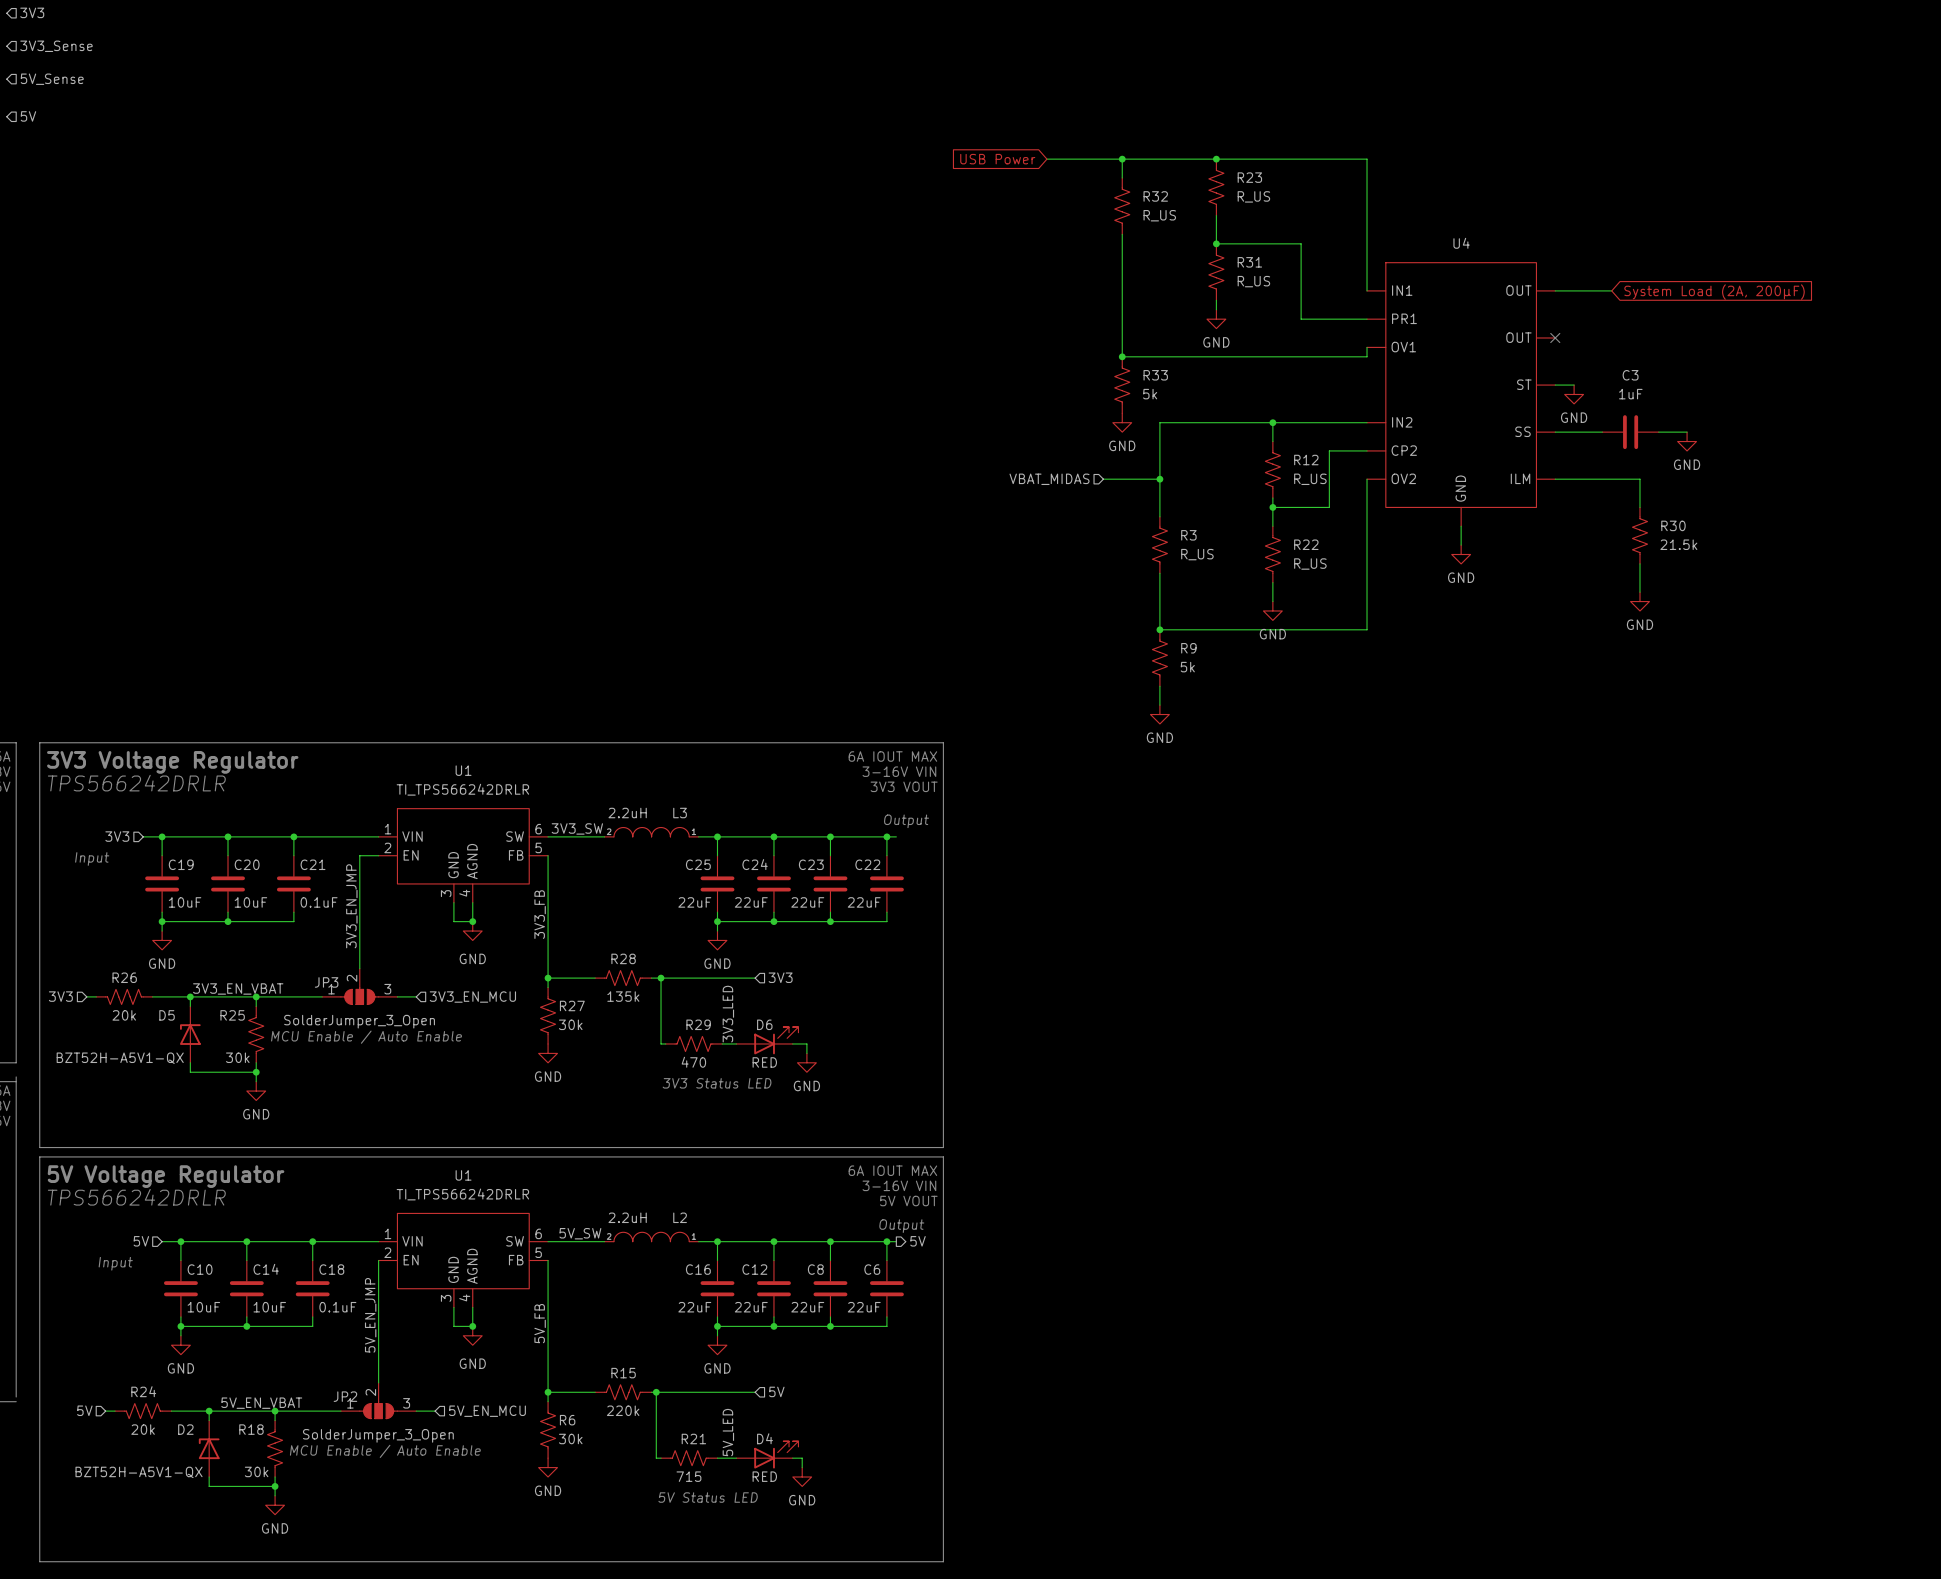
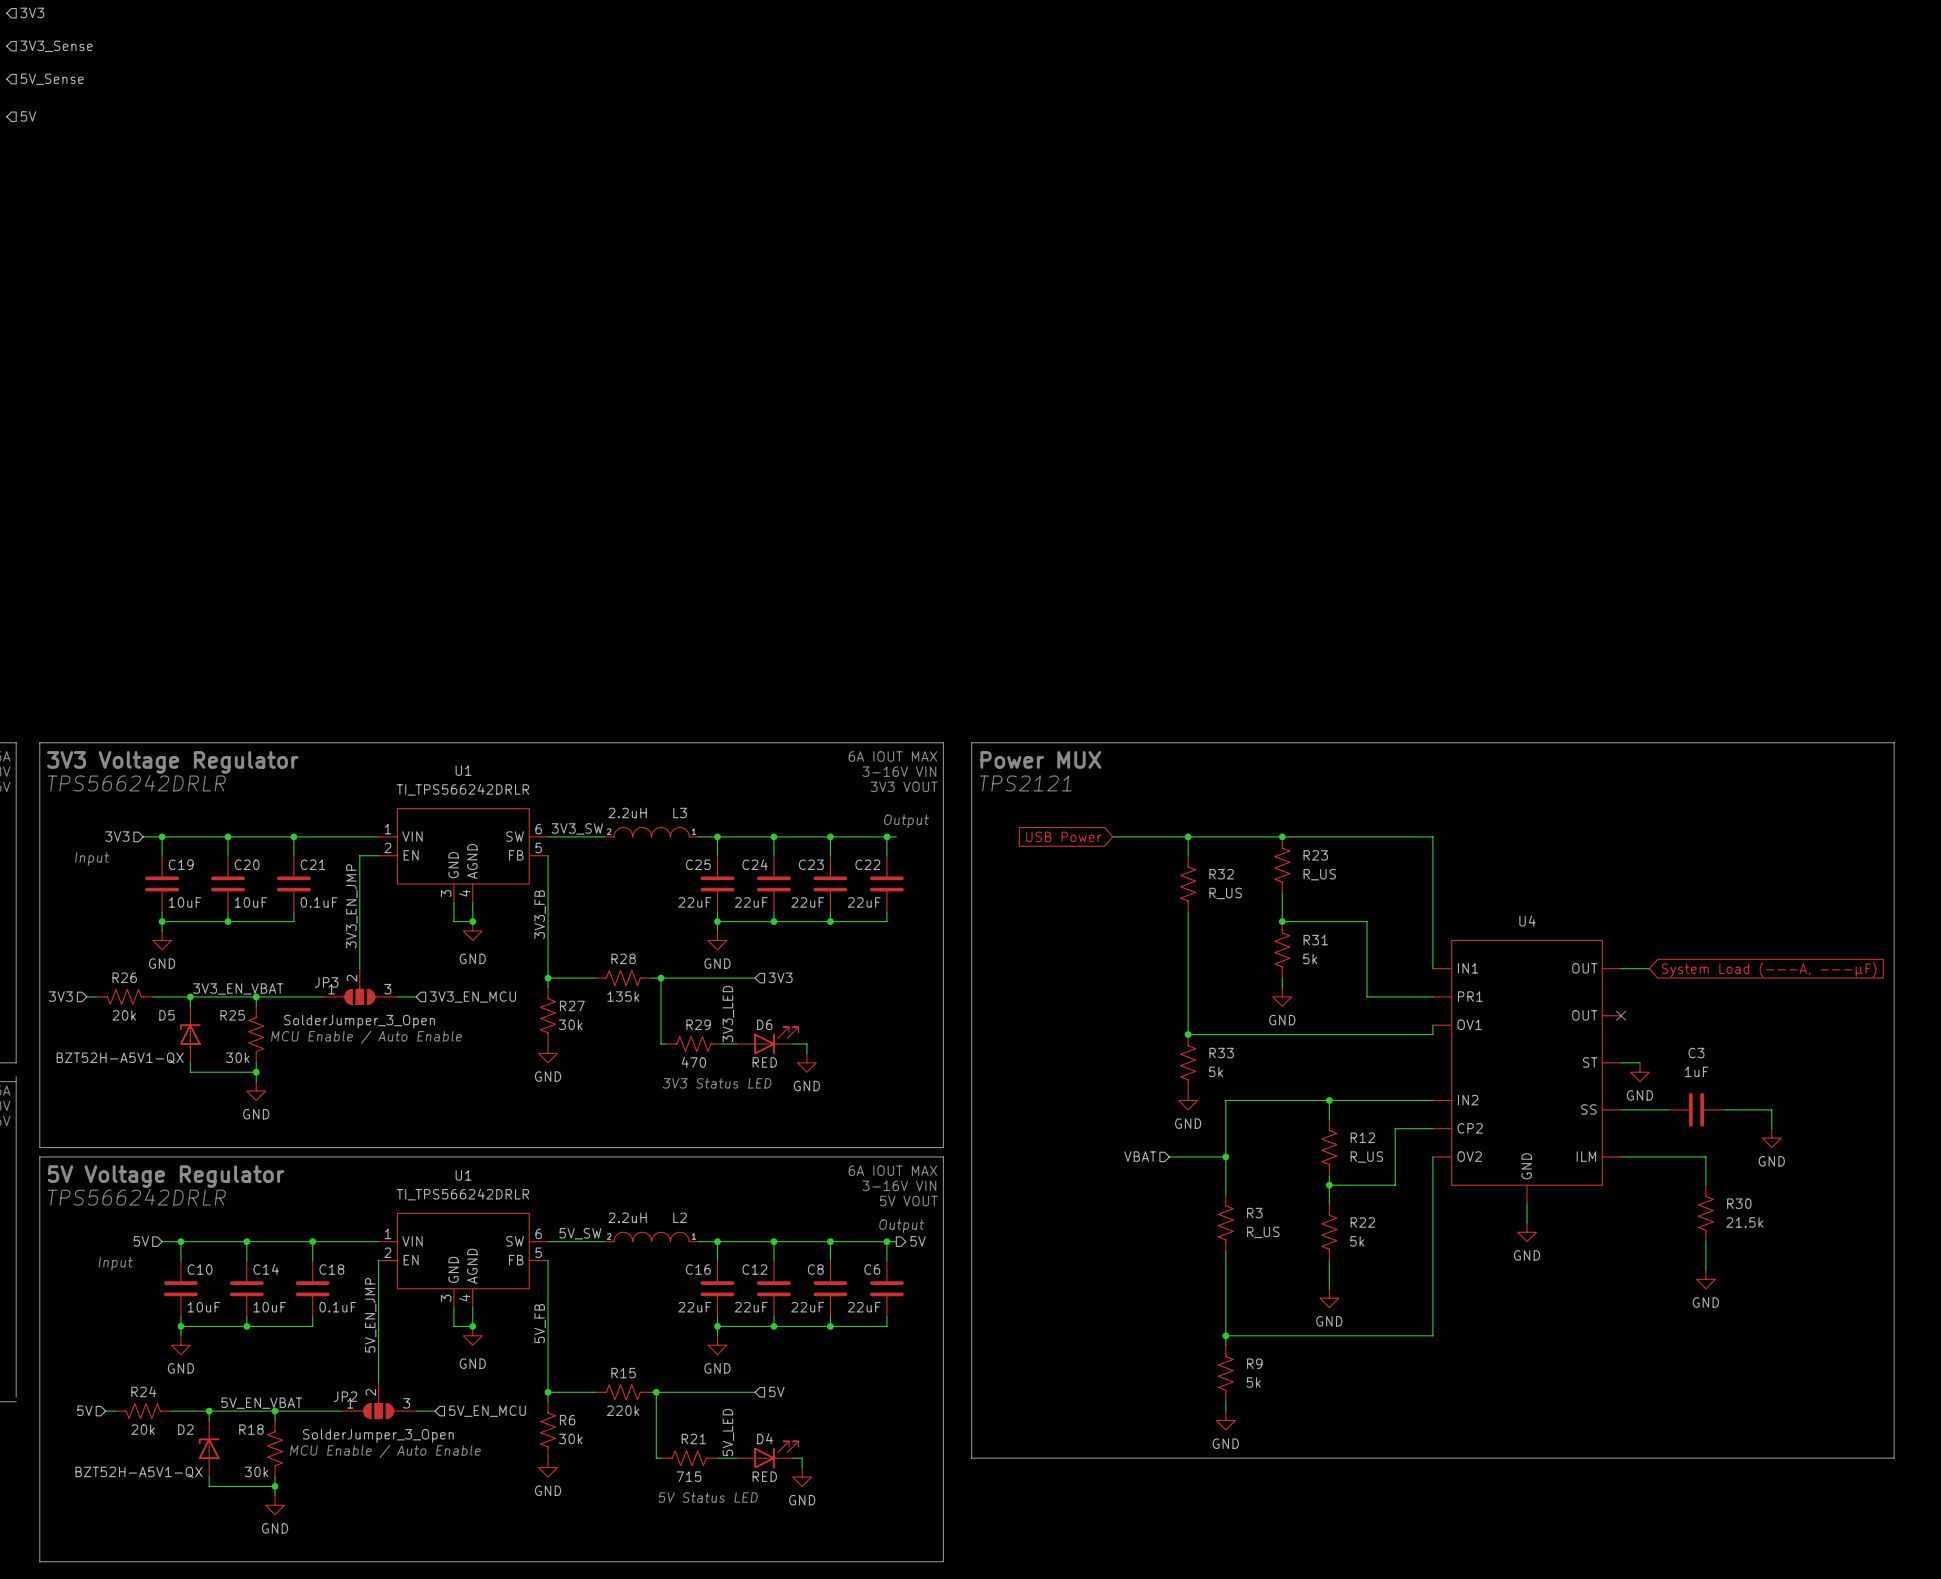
global label: USB Power (997, 159) -> none
wire: (1046, 159) (1367, 159) (1367, 290) -> none
wire: (1122, 159) (1122, 177) -> none
junction: (1122, 159) -> none
junction: (1216, 159) -> none
R23 position: (1216, 187) -> (1282, 865)
R32 position: (1122, 206) -> (1188, 883)
wire: (1216, 215) (1216, 243) (1301, 243) (1301, 319) (1367, 319) -> none
wire: (1122, 234) (1122, 356) (1367, 356) (1367, 347) -> none
junction: (1216, 243) -> none
R31 position: (1216, 272) -> (1282, 949)
R31 value: R_US (1253, 281) -> 5k (1310, 958)
wire: (1555, 290) (1611, 290) -> none
global label: System Load (2A, 200μF) (1714, 292) -> none
wire: (1216, 300) (1216, 309) -> none
power symbol: GND (1216, 319) -> none
no-connect mark: (1555, 337) -> none
junction: (1122, 356) -> none
R33 position: (1122, 385) -> (1188, 1062)
wire: (1555, 385) (1574, 385) -> none
U4 position: (1461, 394) -> (1527, 1072)
power symbol: GND (1574, 394) -> none
power symbol: GND (1122, 422) -> none
wire: (1272, 422) (1272, 441) -> none
junction: (1272, 422) -> none
wire: (1367, 422) (1159, 422) (1159, 516) -> none
wire: (1555, 432) (1602, 432) -> none
C3 position: (1630, 432) -> (1696, 1109)
wire: (1658, 432) (1687, 432) -> none
power symbol: GND (1687, 441) -> none
wire: (1367, 450) (1329, 450) (1329, 507) (1272, 507) -> none
R12 position: (1272, 469) -> (1329, 1147)
hierarchical label: VBAT_MIDAS (1049, 479) -> none
wire: (1103, 479) (1159, 479) -> none
junction: (1159, 479) -> none
wire: (1367, 479) (1367, 629) (1159, 629) (1159, 573) -> none
wire: (1555, 479) (1639, 479) (1639, 507) -> none
wire: (1272, 498) (1272, 526) -> none
junction: (1272, 507) -> none
wire: (1461, 526) (1461, 545) -> none
R30 position: (1639, 535) -> (1705, 1213)
R3 position: (1159, 545) -> (1225, 1222)
R22 position: (1272, 554) -> (1329, 1232)
power symbol: GND (1461, 554) -> none
wire: (1639, 563) (1639, 592) -> none
R22 value: R_US (1310, 564) -> 5k (1357, 1241)
wire: (1272, 582) (1272, 601) -> none
power symbol: GND (1639, 601) -> none
power symbol: GND (1272, 610) -> none
junction: (1159, 629) -> none
R9 position: (1159, 658) -> (1225, 1373)
wire: (1159, 686) (1159, 705) -> (1188, 836) (1188, 855)
power symbol: GND (1159, 714) -> none
line: none -> (971, 742) (971, 1458) (1894, 1458) (1894, 742) (971, 742)
text: none -> Power MUX (1040, 759)
text: none -> TPS2121 (1025, 783)
global label: none -> USB Power (1063, 836)
wire: none -> (1112, 836) (1432, 836) (1432, 968)
junction: none -> (1188, 836)
junction: none -> (1282, 836)
wire: none -> (1282, 893) (1282, 921) (1367, 921) (1367, 996) (1432, 996)
wire: none -> (1188, 912) (1188, 1034) (1432, 1034) (1432, 1025)
junction: none -> (1282, 921)
wire: none -> (1621, 968) (1649, 968)
global label: none -> System Load (---A, ---μF) (1769, 969)
wire: none -> (1282, 978) (1282, 987)
power symbol: none -> GND (1282, 996)
no-connect mark: none -> (1621, 1015)
junction: none -> (1188, 1034)
wire: none -> (1621, 1062) (1639, 1062)
power symbol: none -> GND (1639, 1072)
power symbol: none -> GND (1188, 1100)
wire: none -> (1329, 1100) (1329, 1119)
junction: none -> (1329, 1100)
wire: none -> (1432, 1100) (1225, 1100) (1225, 1194)
wire: none -> (1621, 1109) (1668, 1109)
wire: none -> (1724, 1109) (1771, 1109) (1771, 1128)
wire: none -> (1432, 1128) (1395, 1128) (1395, 1185) (1329, 1185)
power symbol: none -> GND (1771, 1138)
hierarchical label: none -> VBAT (1140, 1156)
wire: none -> (1169, 1156) (1225, 1156)
junction: none -> (1225, 1156)
wire: none -> (1432, 1156) (1432, 1335) (1225, 1335)
wire: none -> (1621, 1156) (1705, 1156) (1705, 1185)
wire: none -> (1329, 1175) (1329, 1204)
junction: none -> (1329, 1185)
wire: none -> (1527, 1204) (1527, 1222)
power symbol: none -> GND (1527, 1232)
wire: none -> (1705, 1241) (1705, 1269)
wire: none -> (1225, 1251) (1225, 1345)
wire: none -> (1329, 1260) (1329, 1288)
power symbol: none -> GND (1705, 1279)
power symbol: none -> GND (1329, 1298)
junction: none -> (1225, 1335)
wire: none -> (1225, 1401) (1225, 1411)
power symbol: none -> GND (1225, 1420)

